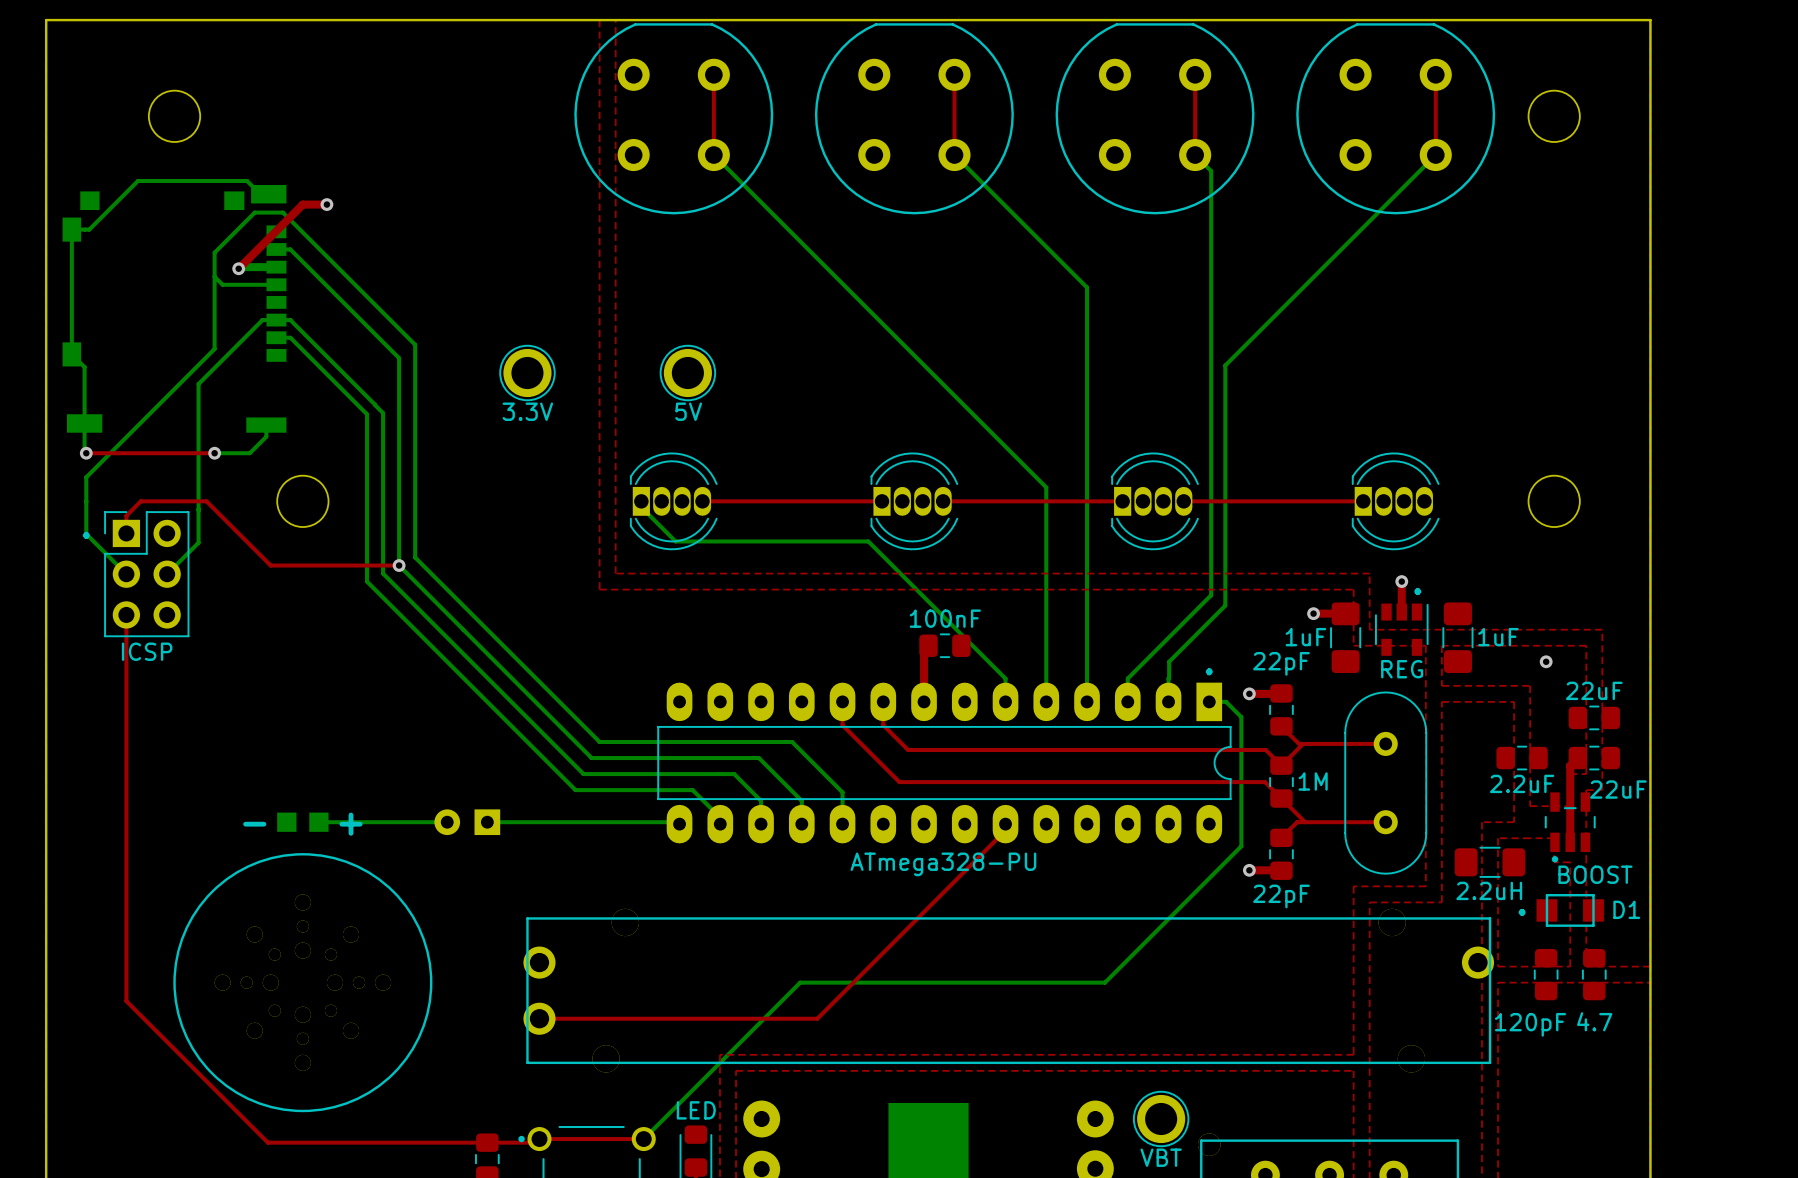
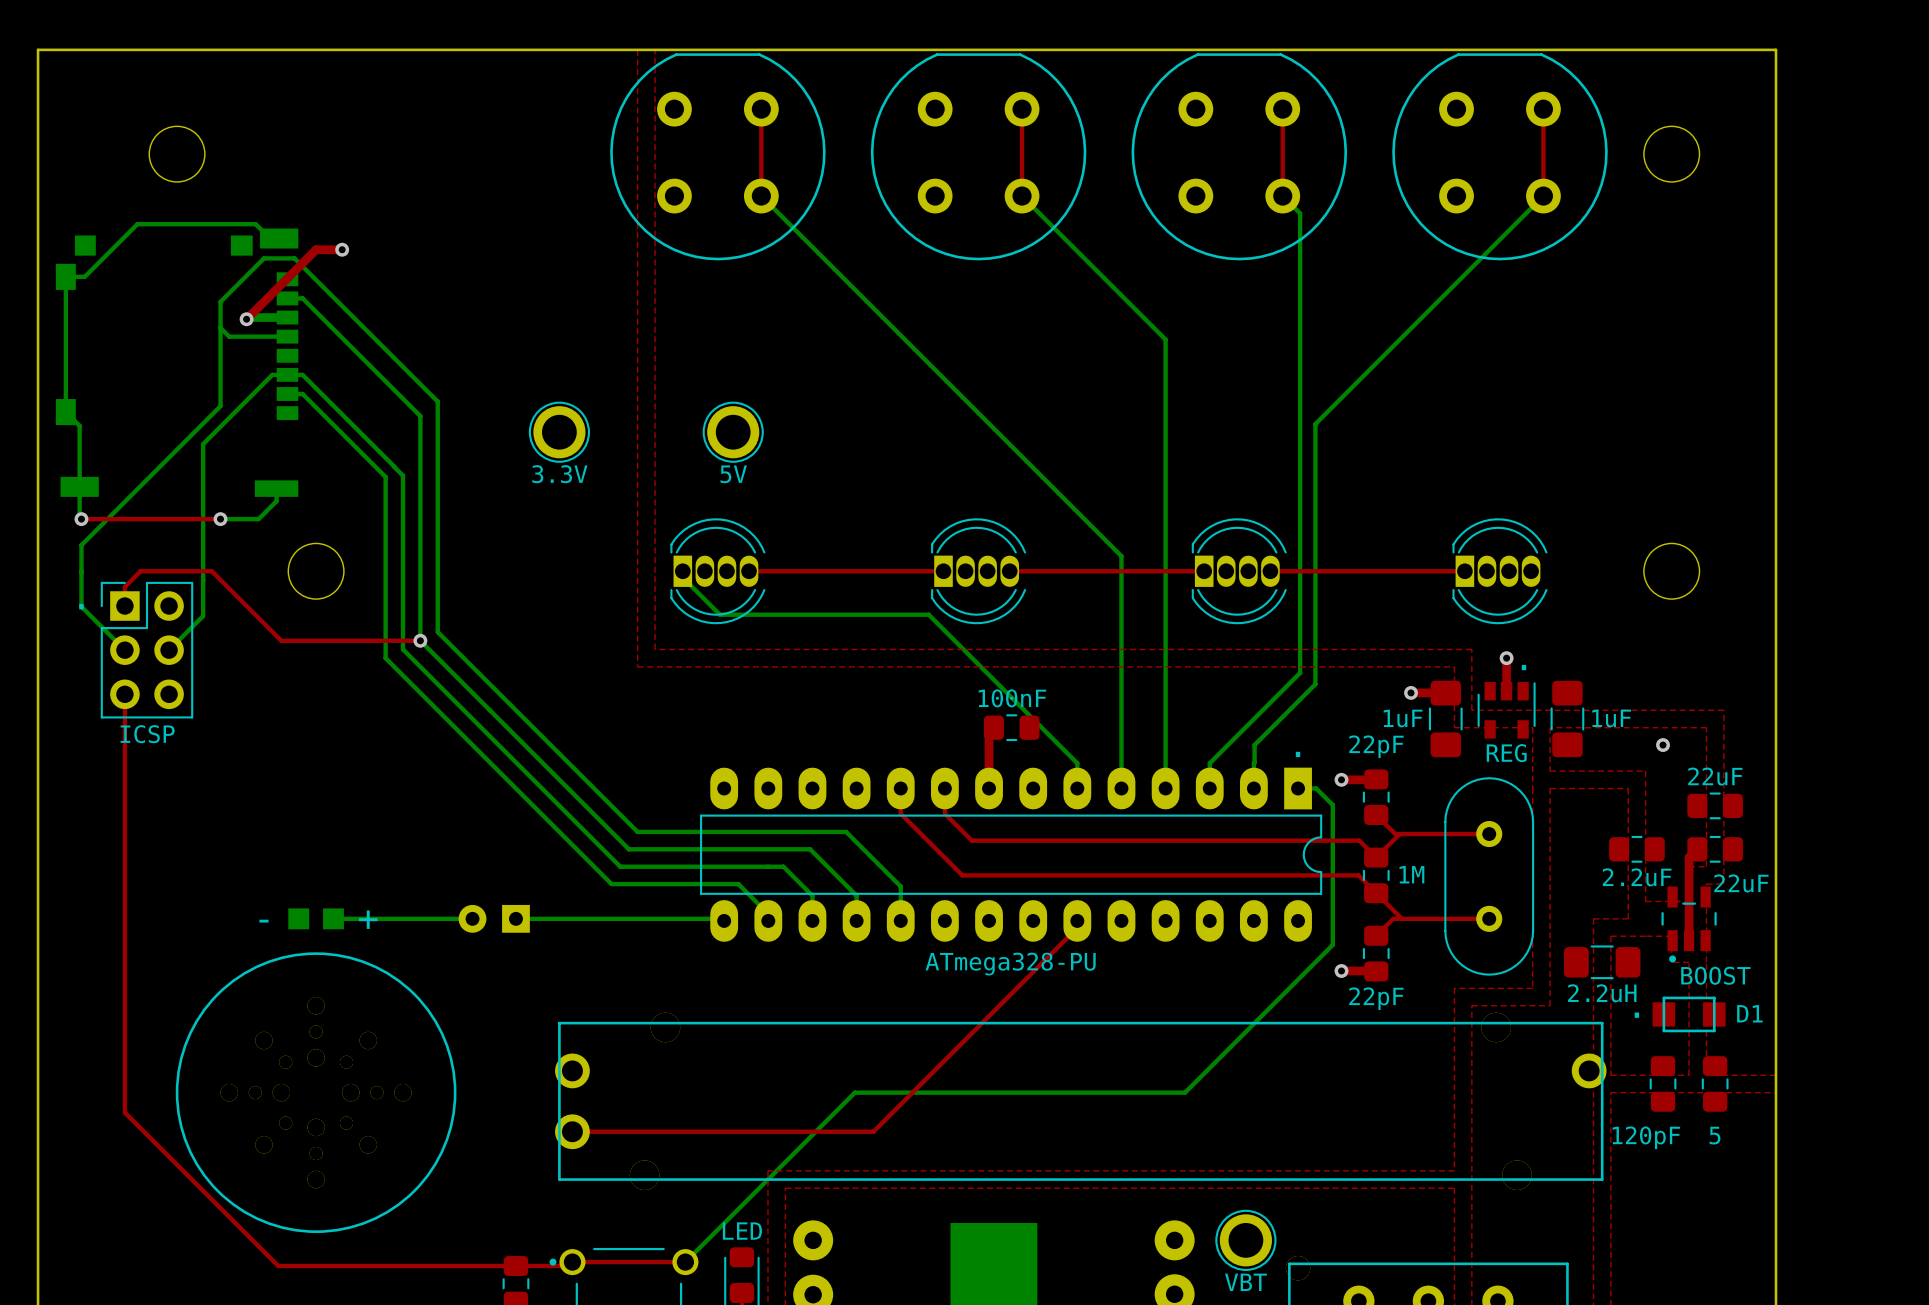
part value: 4.7 (1594, 1021) -> 5 (1715, 1135)

